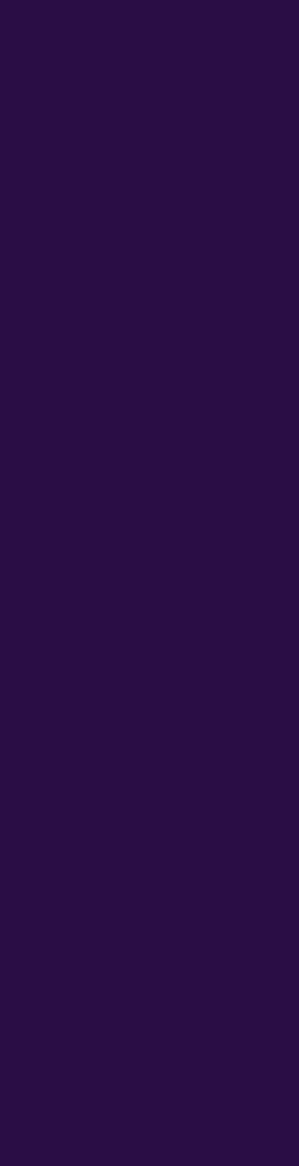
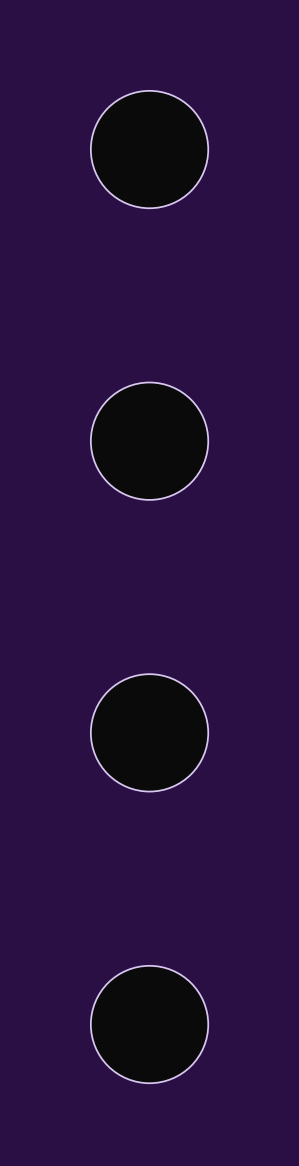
part: none -> (149, 149)
part: none -> (149, 441)
part: none -> (149, 732)
part: none -> (149, 1024)

